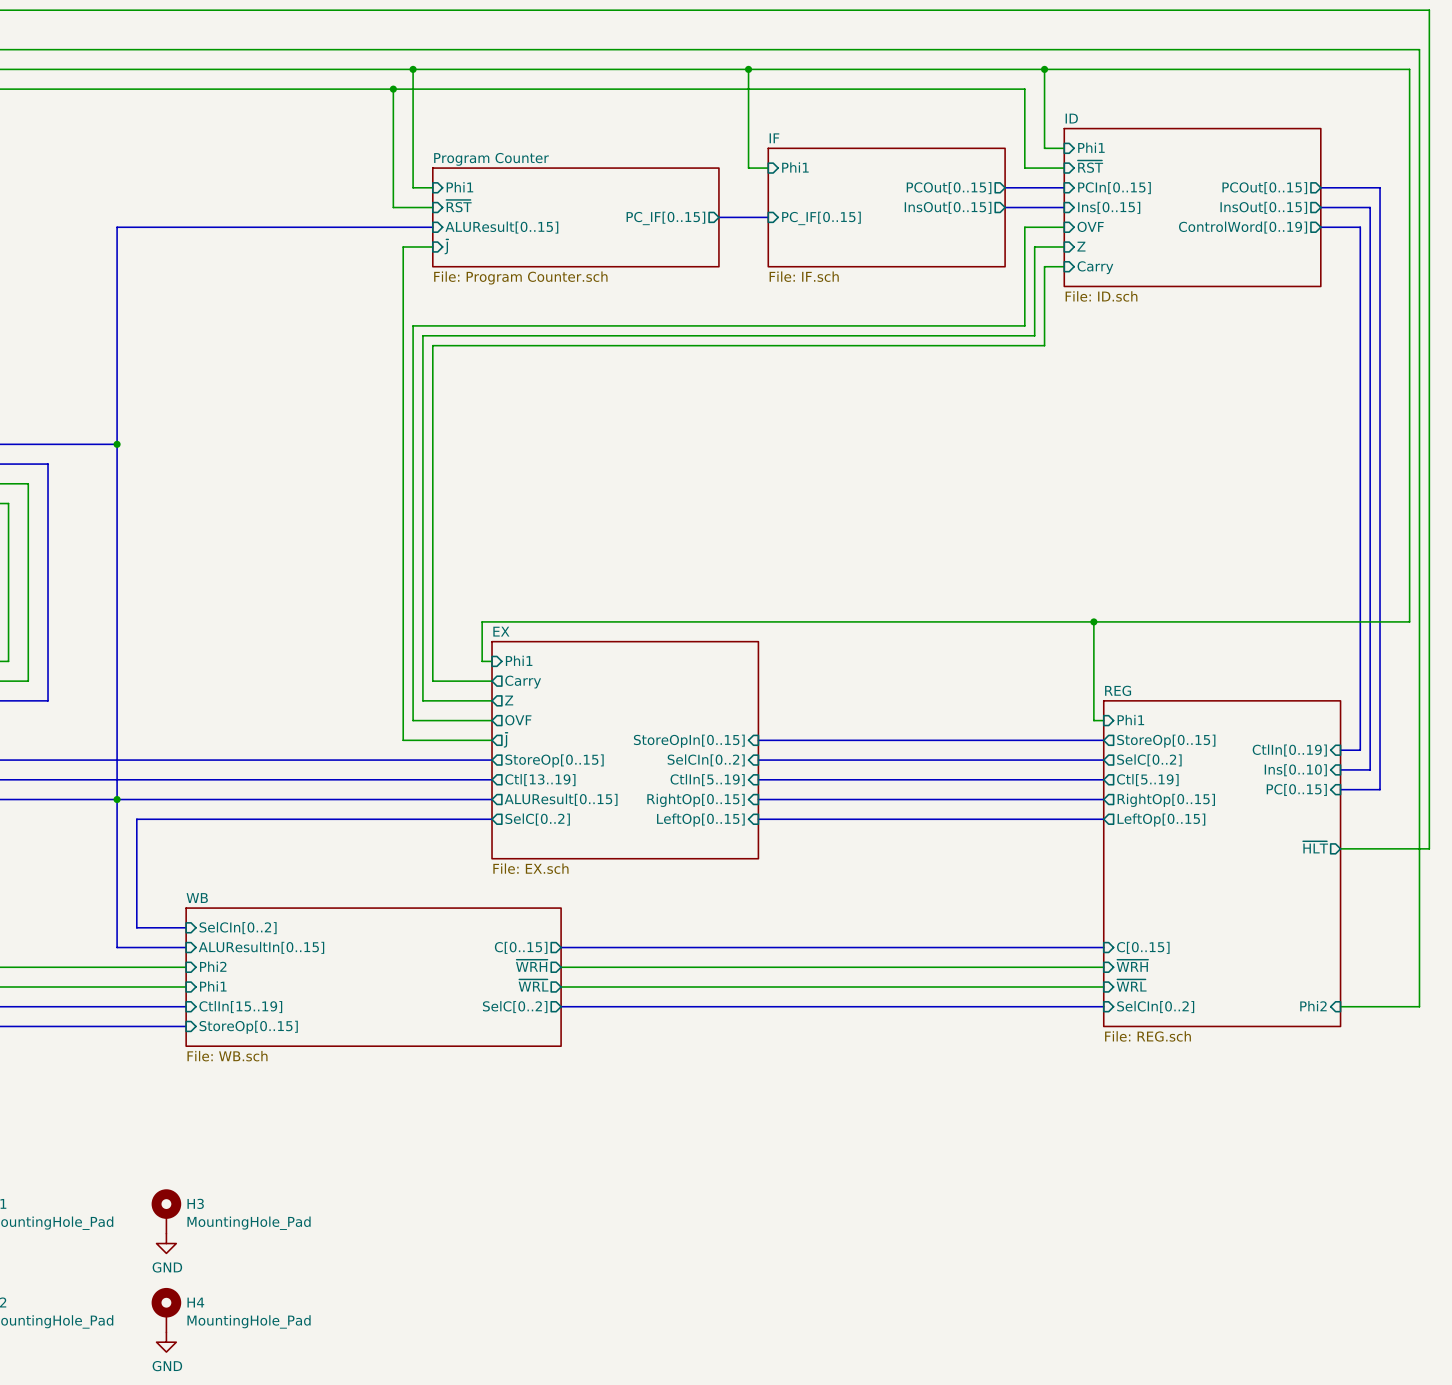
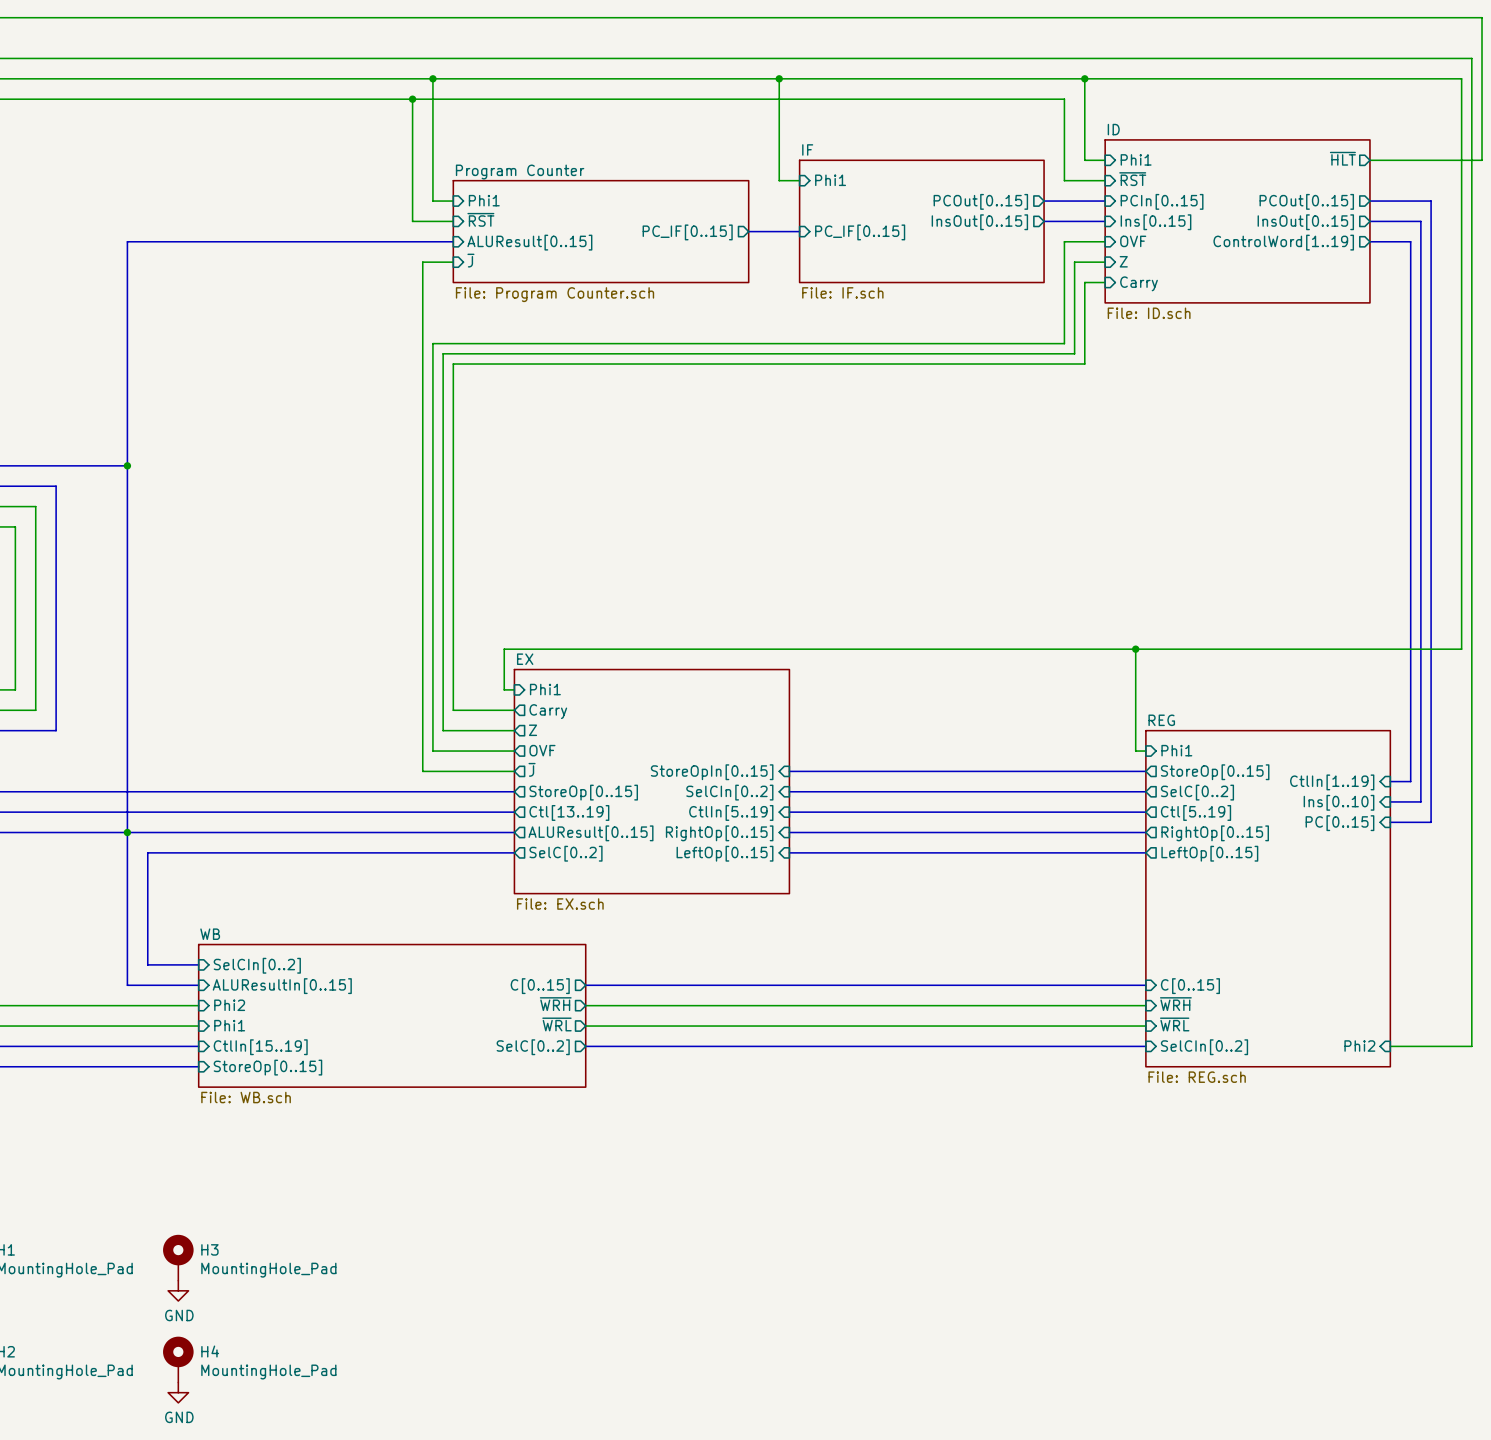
sheet pin: none -> ~{HLT} (1342, 158)
wire: (1429, 148) (1429, 848) (1340, 848) -> (1482, 160) (1369, 160)
sheet pin: ControlWord[0..19] (1243, 227) -> ControlWord[1..19] (1283, 242)
sheet pin: CtlIn[0..19] (1289, 750) -> CtlIn[1..19] (1332, 782)
sheet pin: ~{HLT} (1315, 847) -> none

